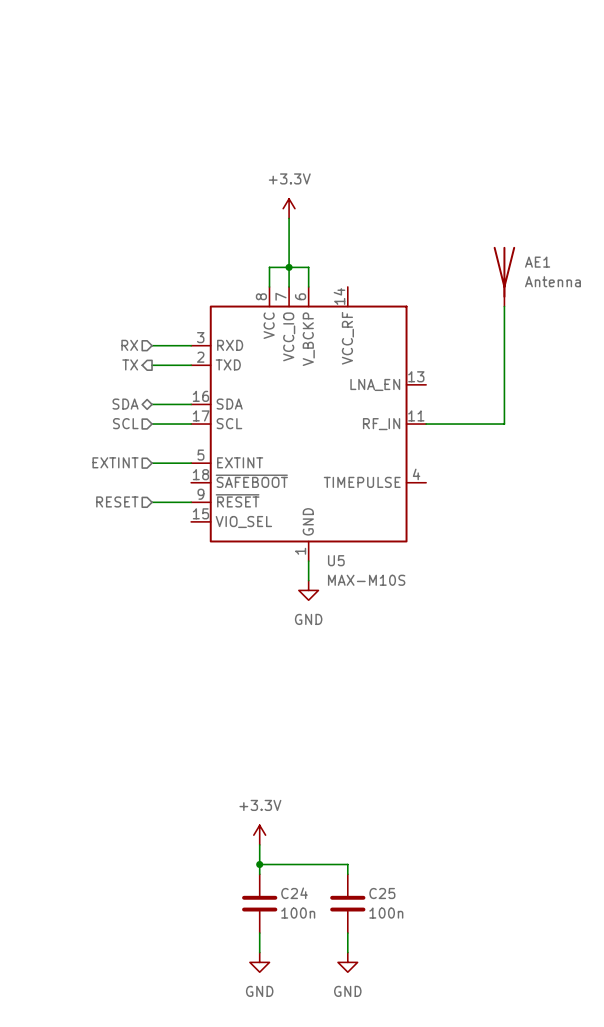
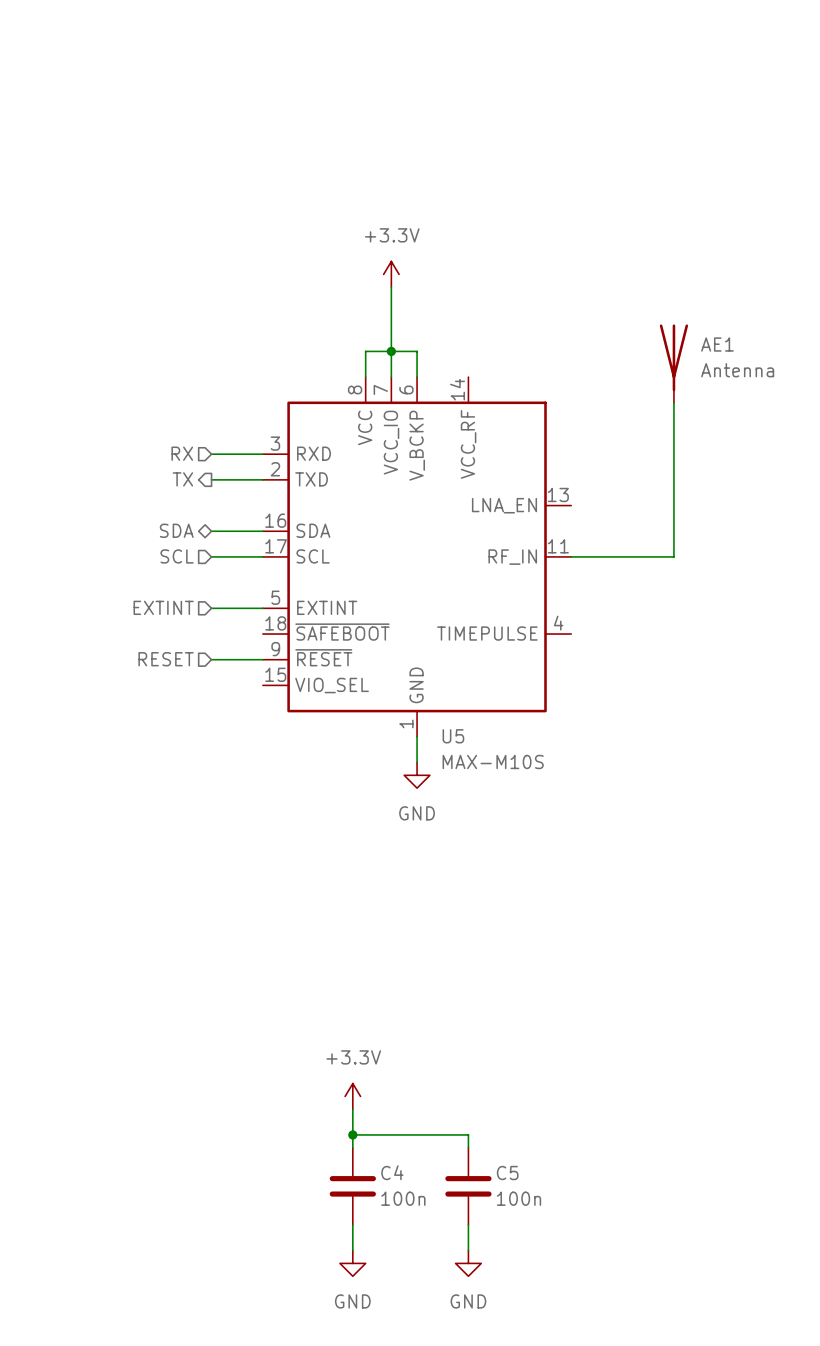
C24 name: C24 (294, 893) -> C4 (392, 1172)
C25 name: C25 (382, 893) -> C5 (507, 1173)

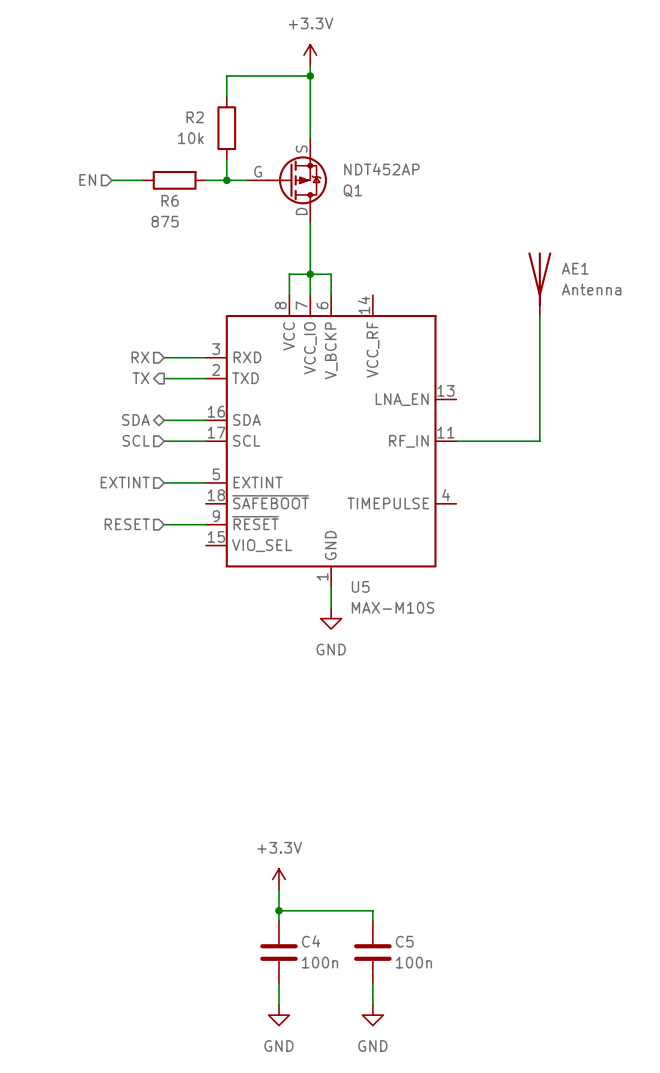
wire: none -> (310, 65) (310, 138)
wire: none -> (310, 76) (226, 76) (226, 96)
junction: none -> (310, 76)
R2: none -> 10k (226, 128)
wire: none -> (226, 159) (226, 180)
hierarchical label: none -> EN (87, 179)
wire: none -> (112, 180) (143, 180)
R6: none -> 875 (174, 180)
wire: none -> (205, 180) (247, 180)
junction: none -> (226, 180)
Q1: none -> NDT452AP (287, 180)
power symbol position: +3.3V (391, 274) -> +3.3V (310, 55)

